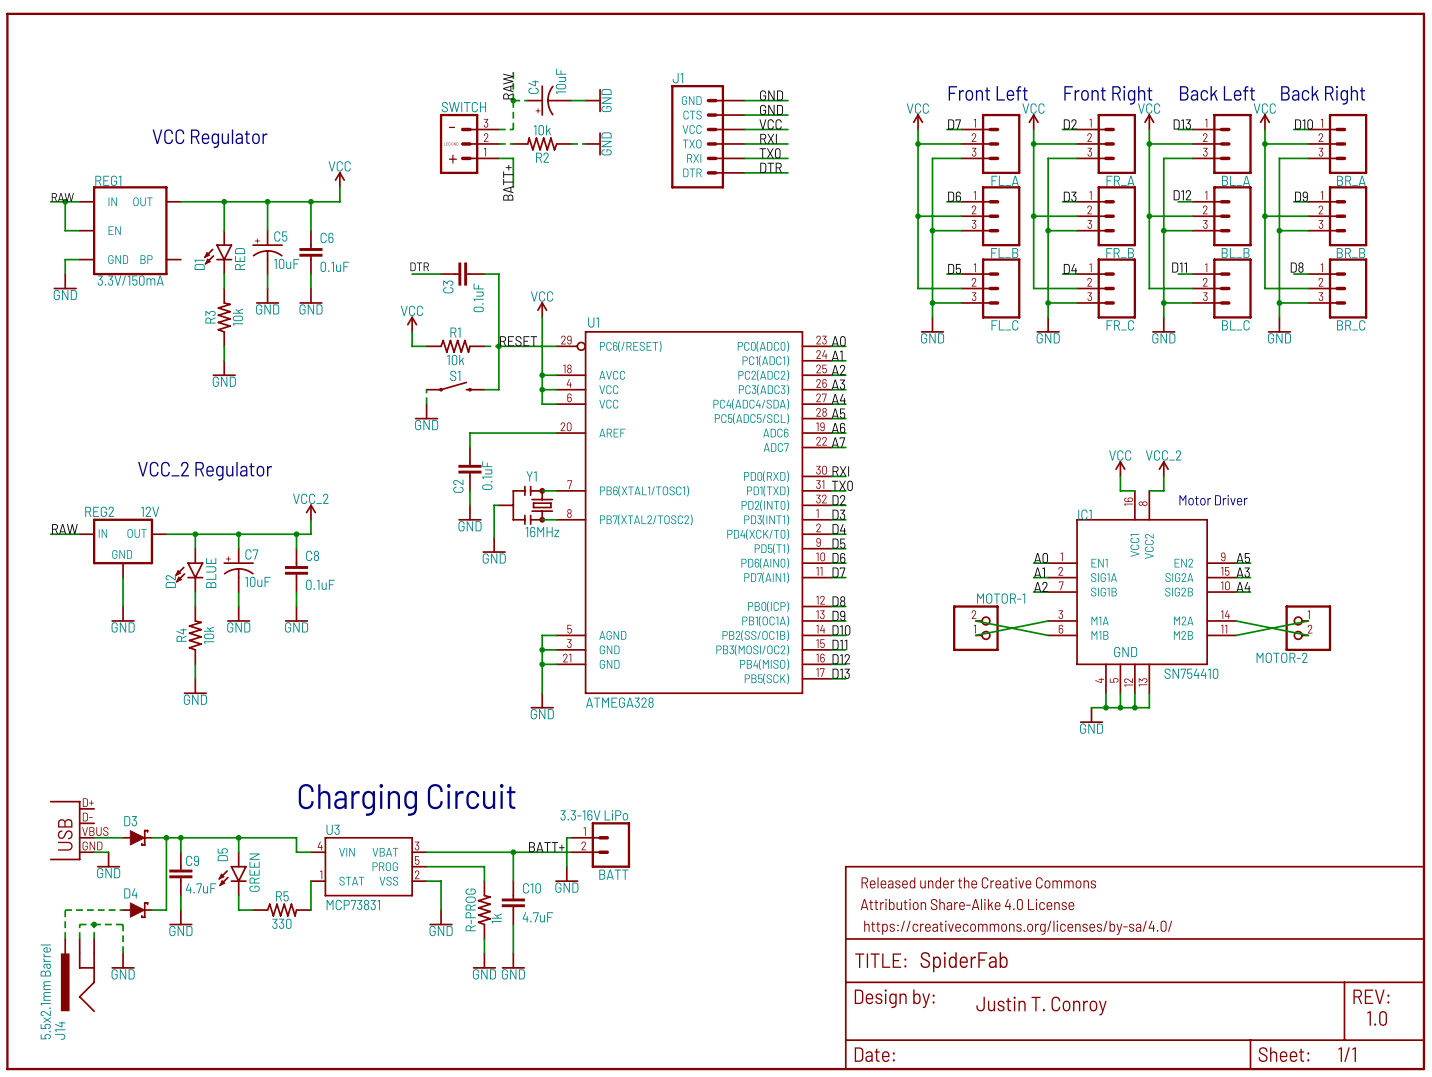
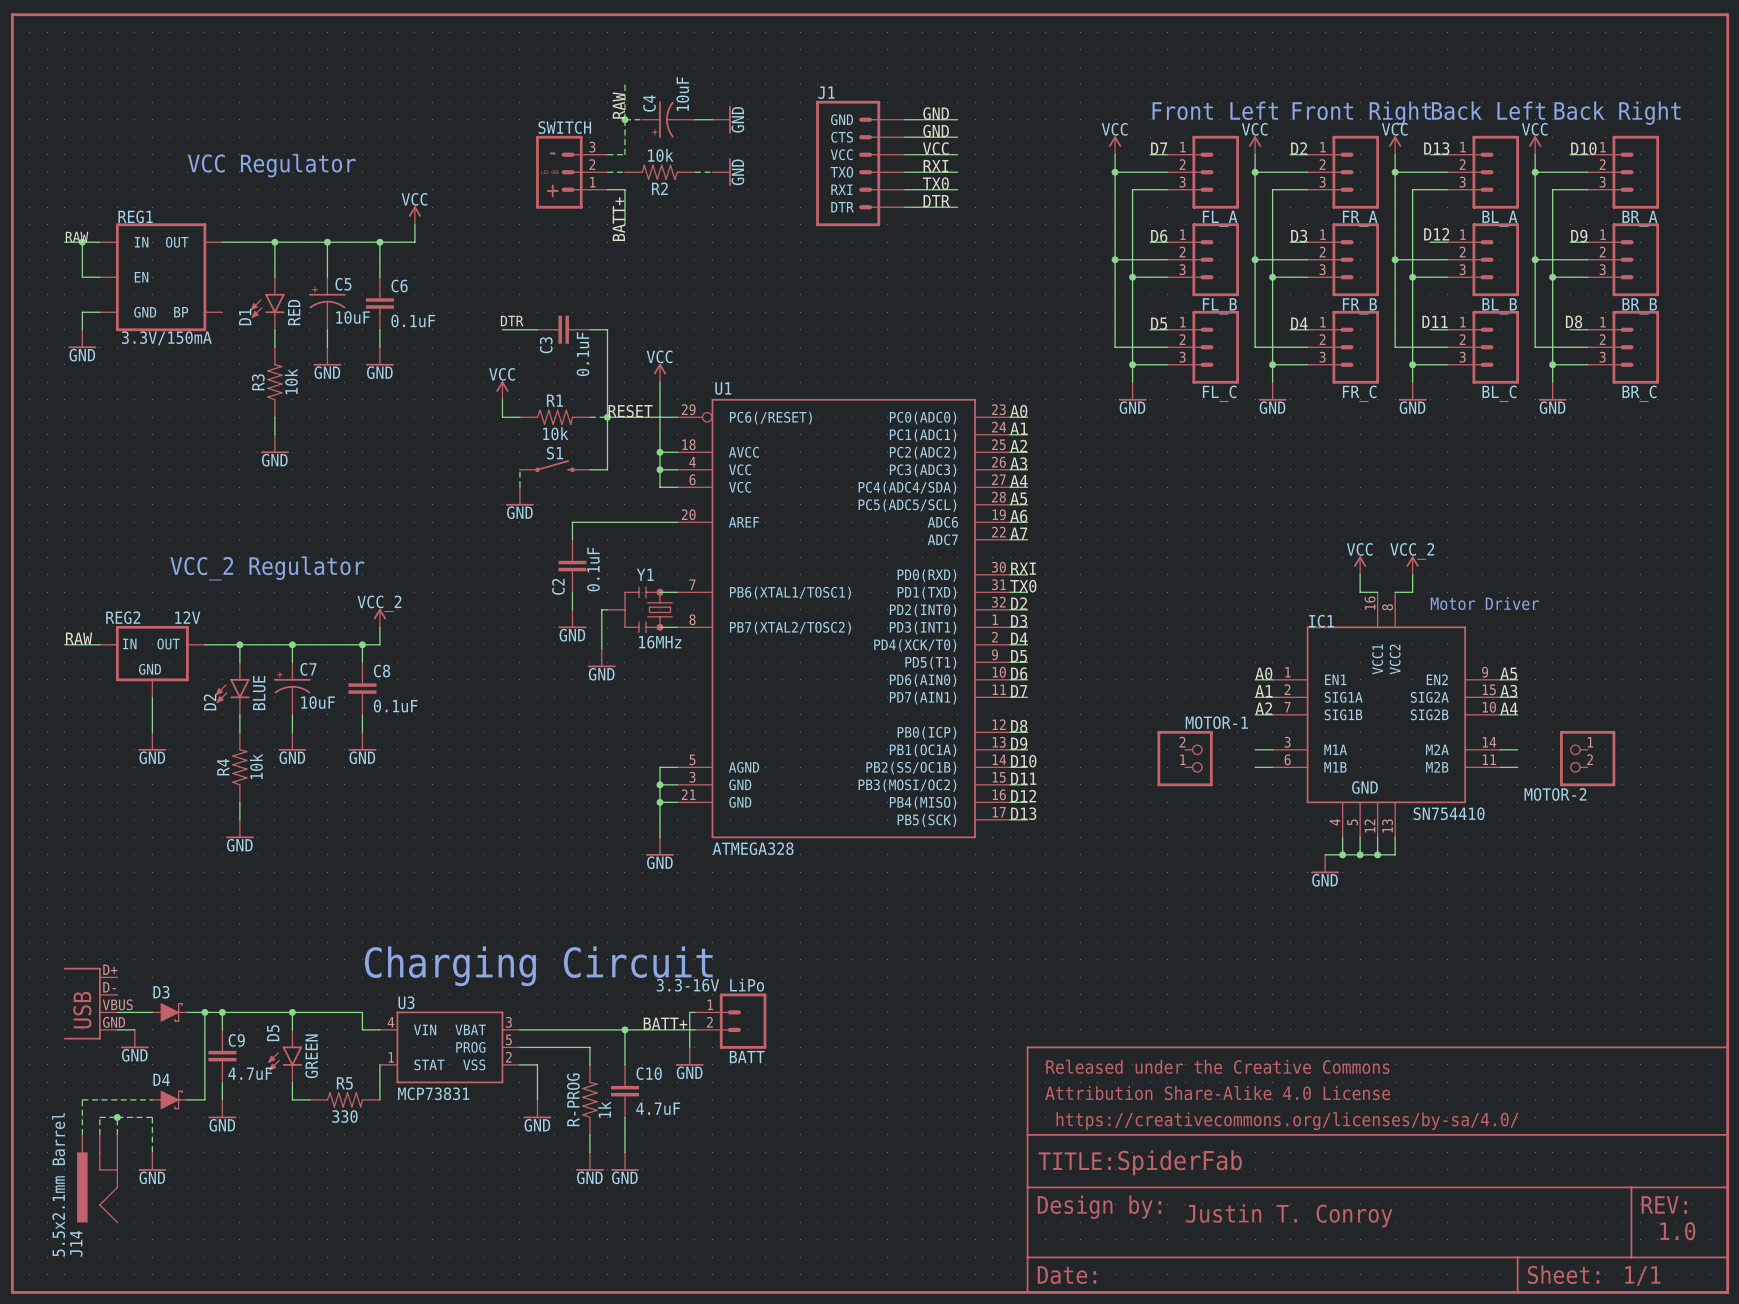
wire: (975, 620) (1048, 635) -> (1255, 767) (1272, 767)
wire: (1048, 620) (975, 635) -> (1272, 749) (1255, 749)
wire: (1236, 620) (1308, 635) -> (1500, 749) (1517, 749)
wire: (1308, 620) (1236, 635) -> (1517, 767) (1500, 767)

